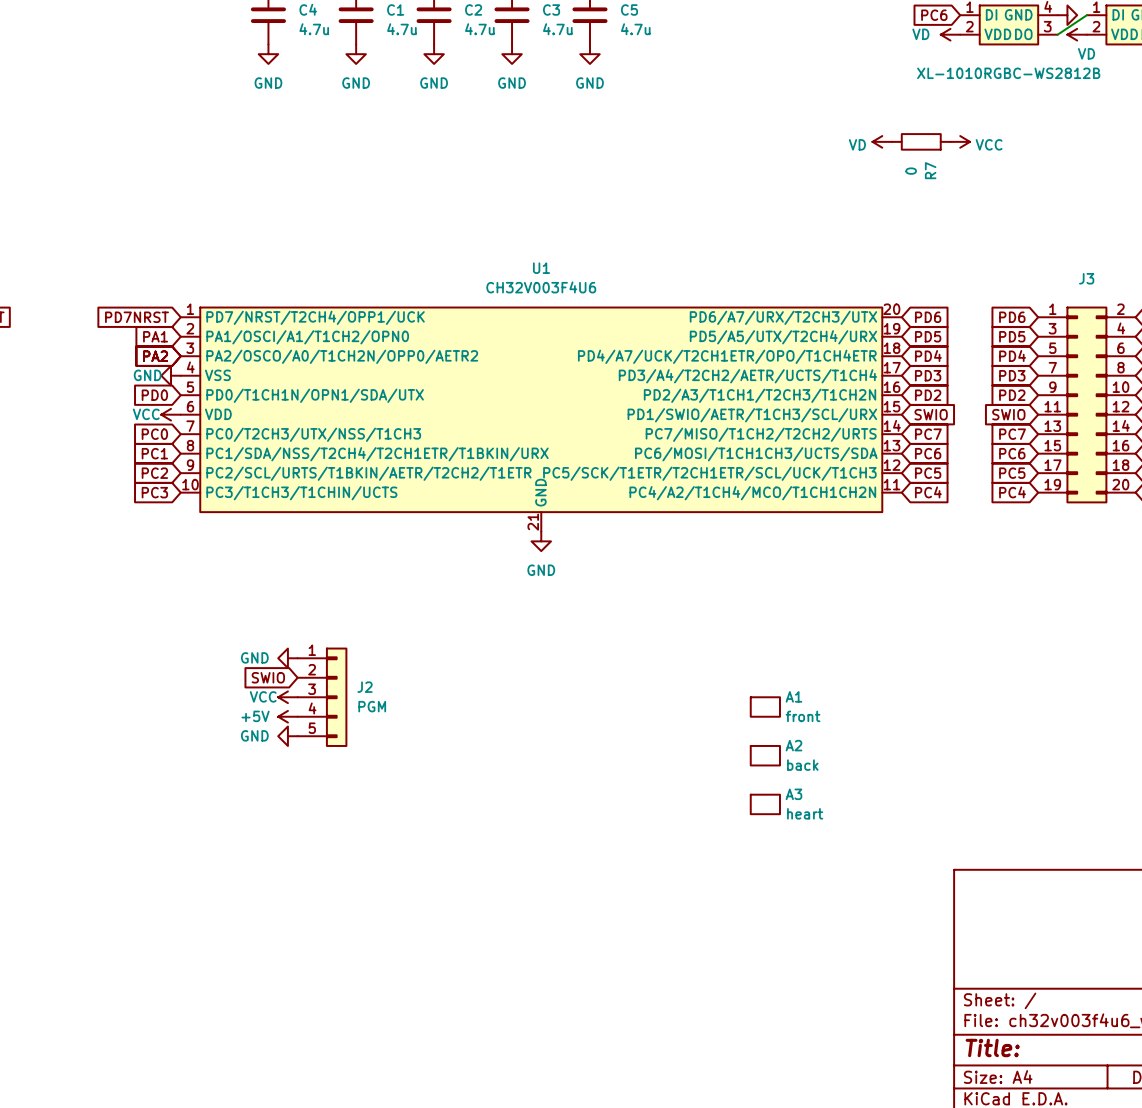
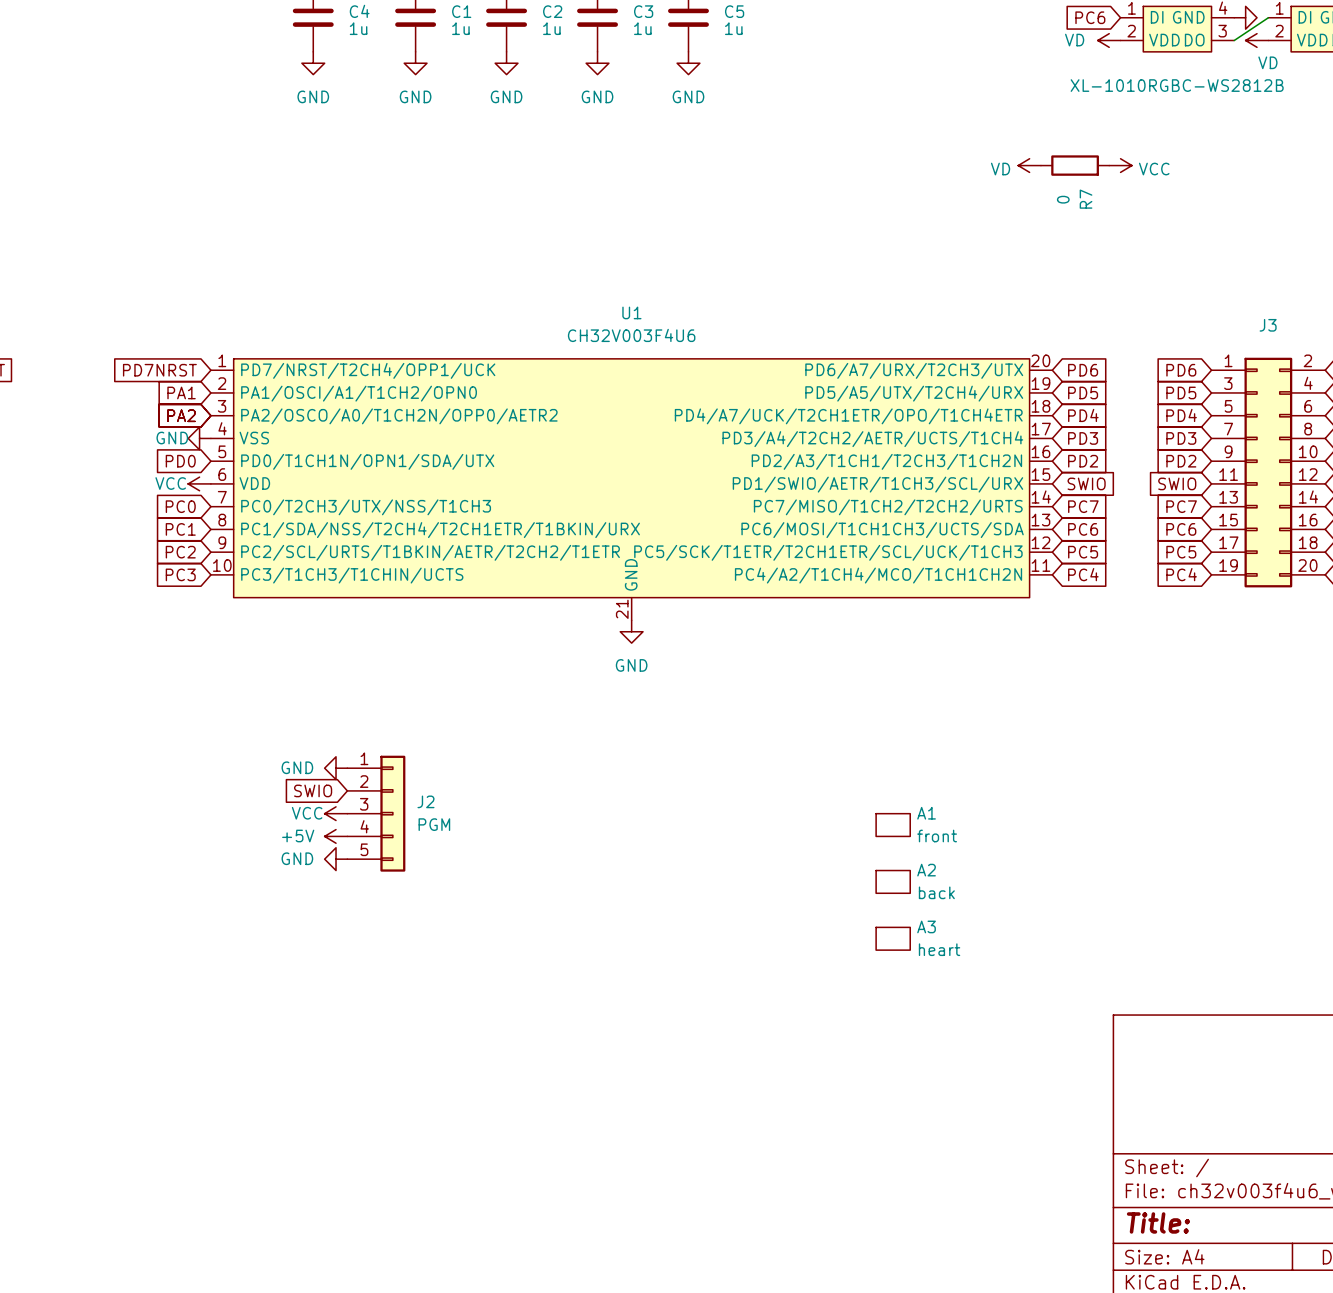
C4 value: 4.7u (314, 29) -> 1u (358, 28)
C1 value: 4.7u (401, 29) -> 1u (460, 28)
C2 value: 4.7u (479, 29) -> 1u (551, 28)
C3 value: 4.7u (557, 29) -> 1u (642, 28)
C5 value: 4.7u (635, 29) -> 1u (733, 28)

